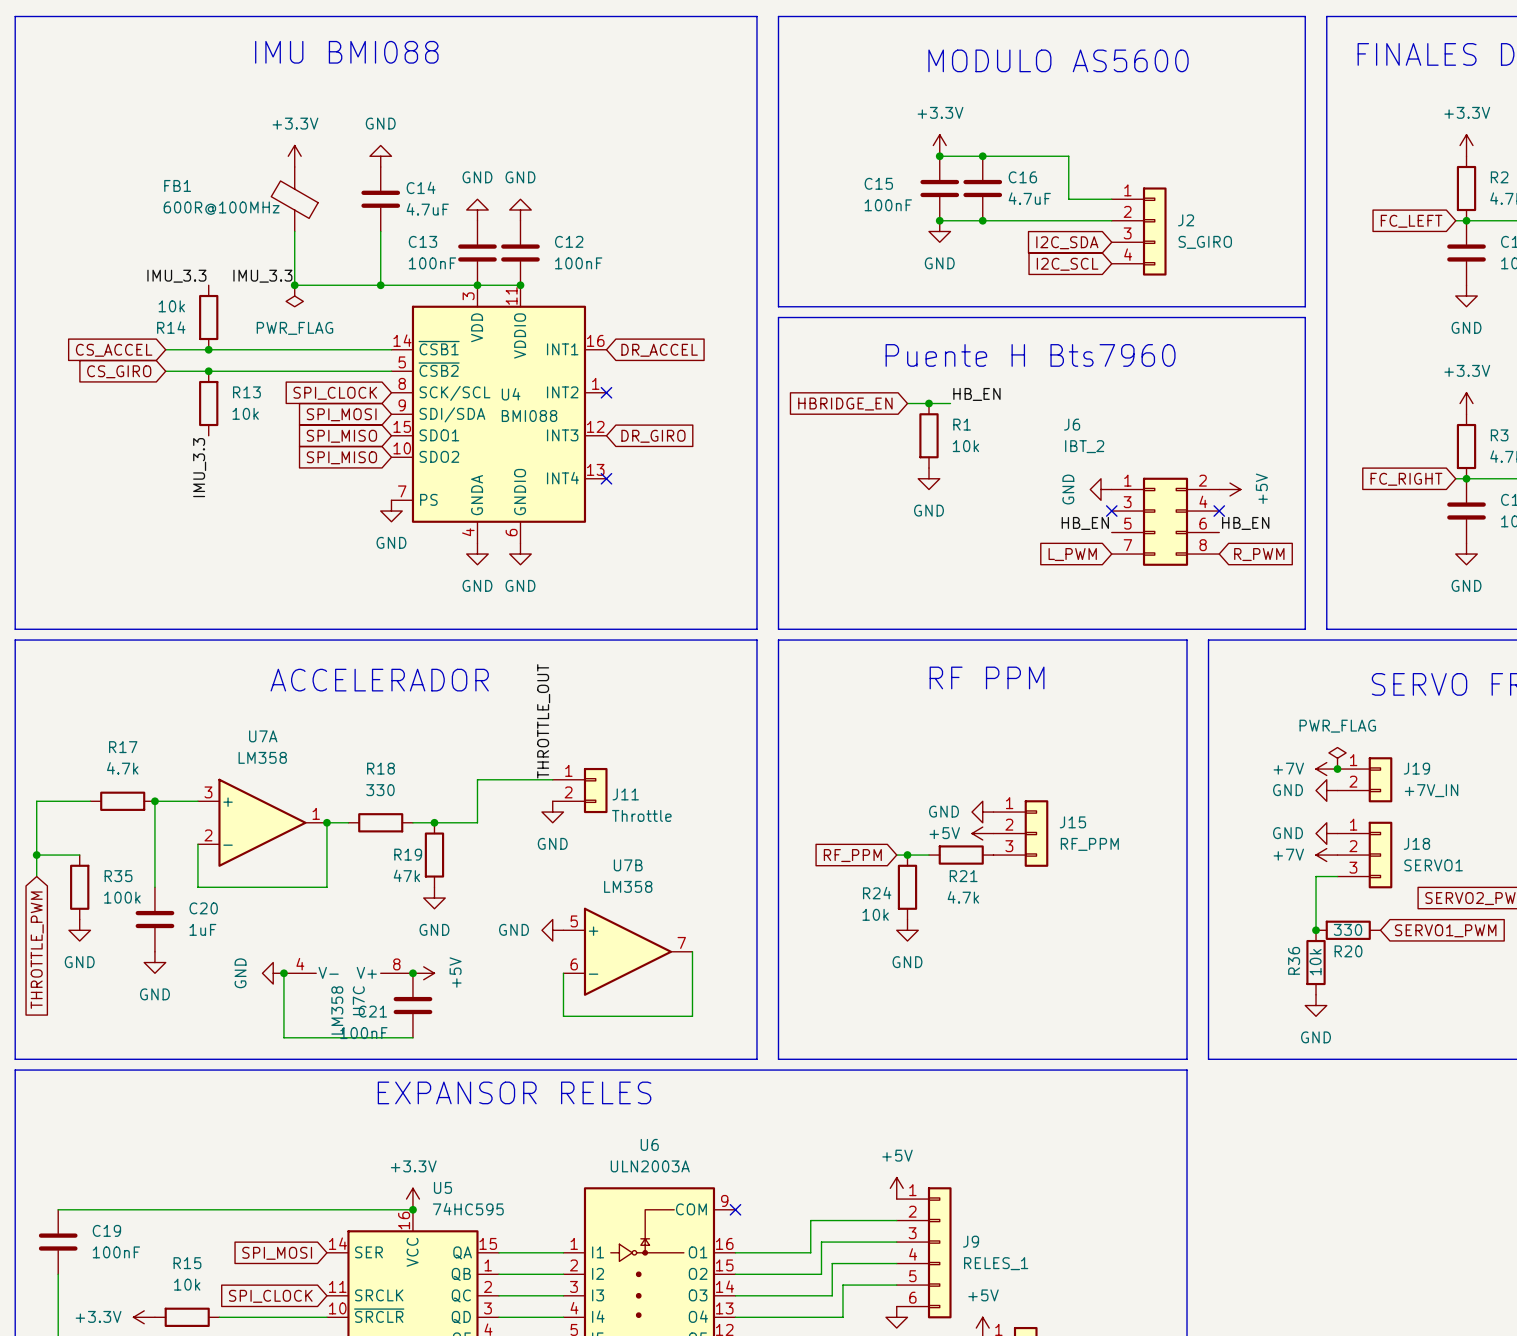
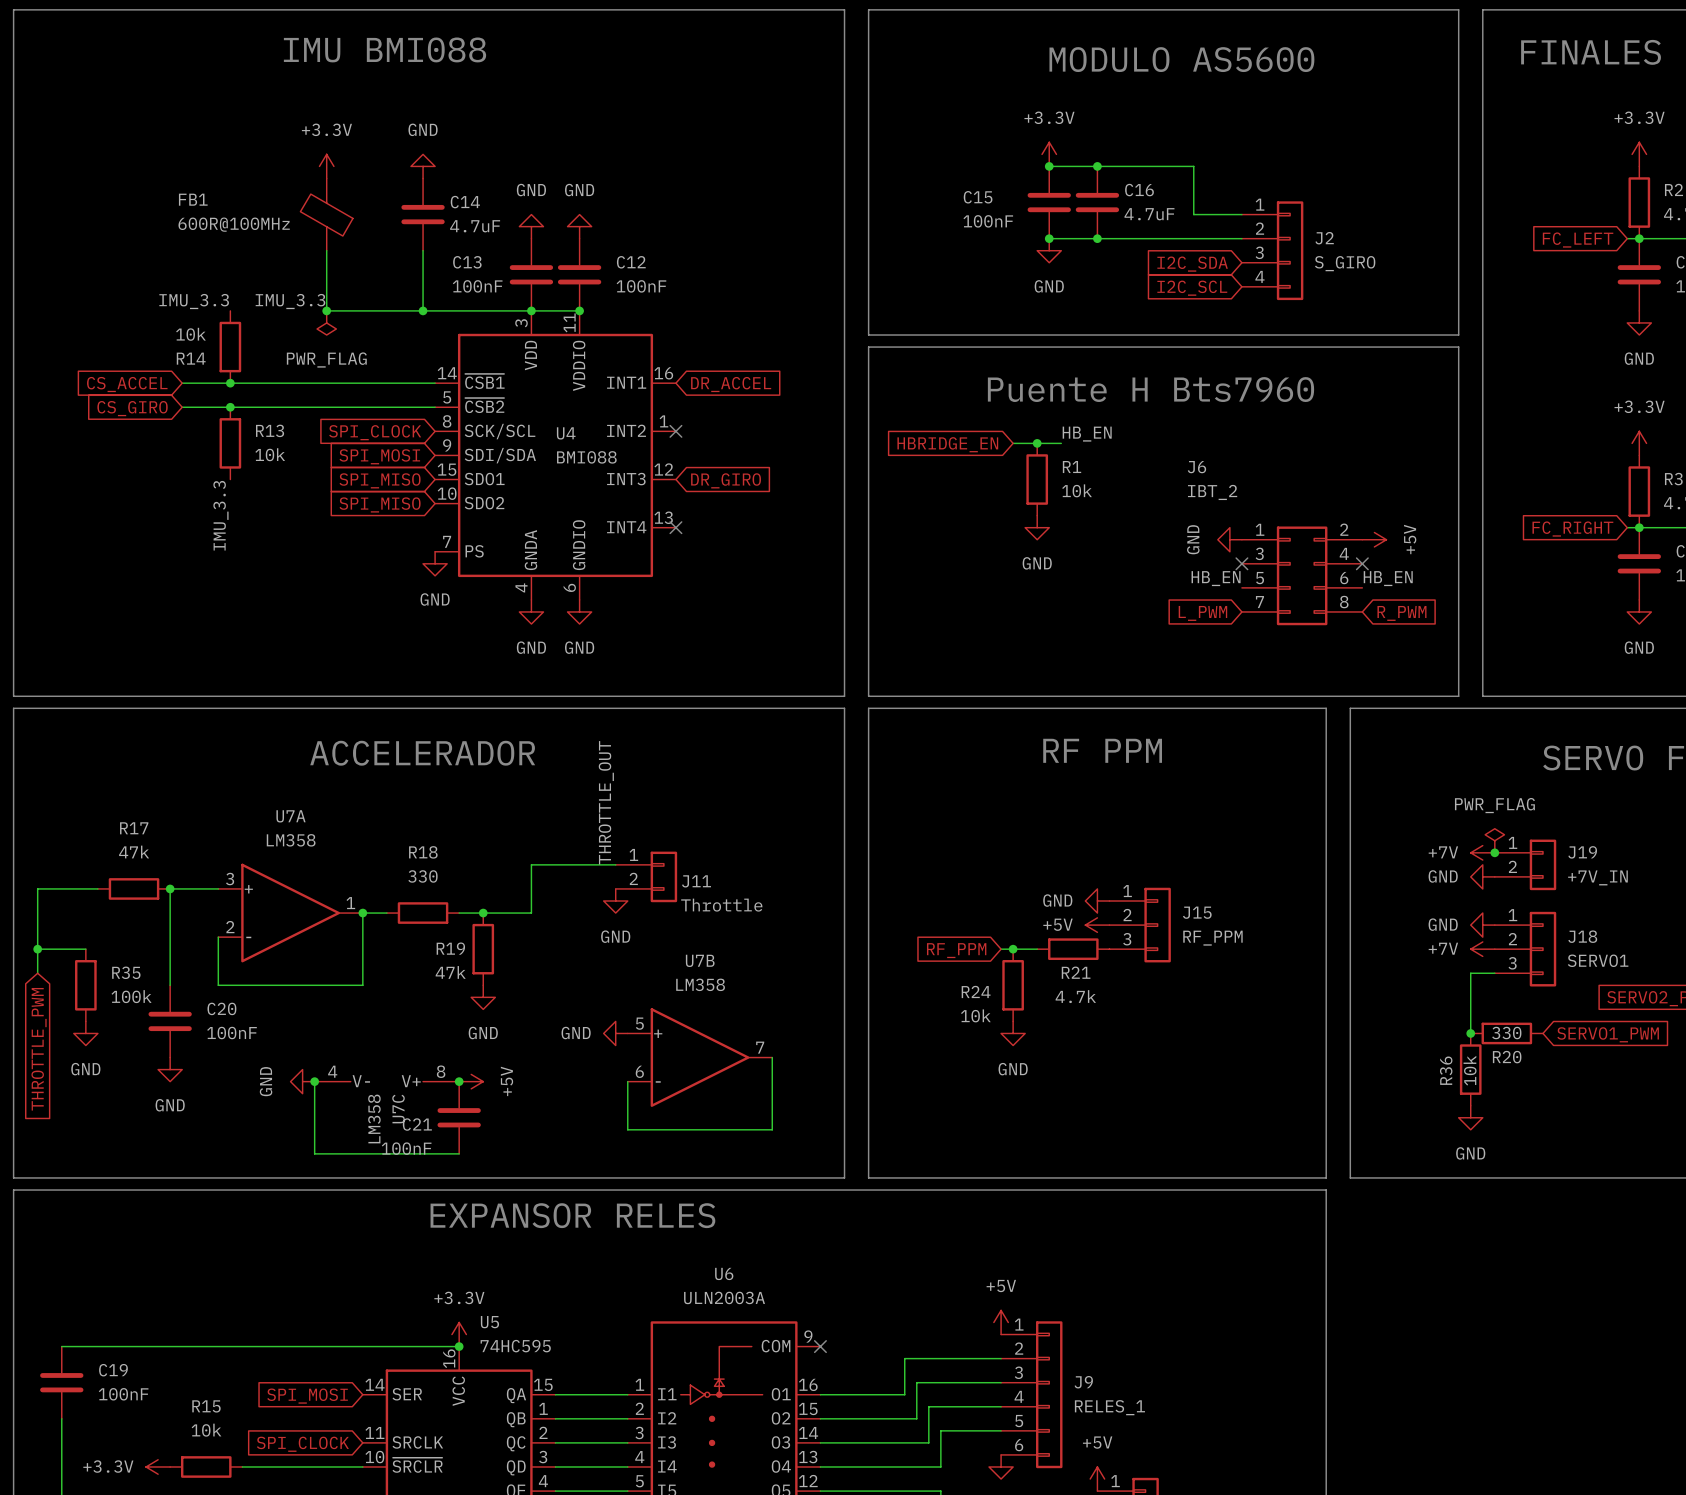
R17 value: 4.7k (122, 768) -> 47k (134, 852)
C20 value: 1uF (202, 929) -> 100nF (232, 1033)

